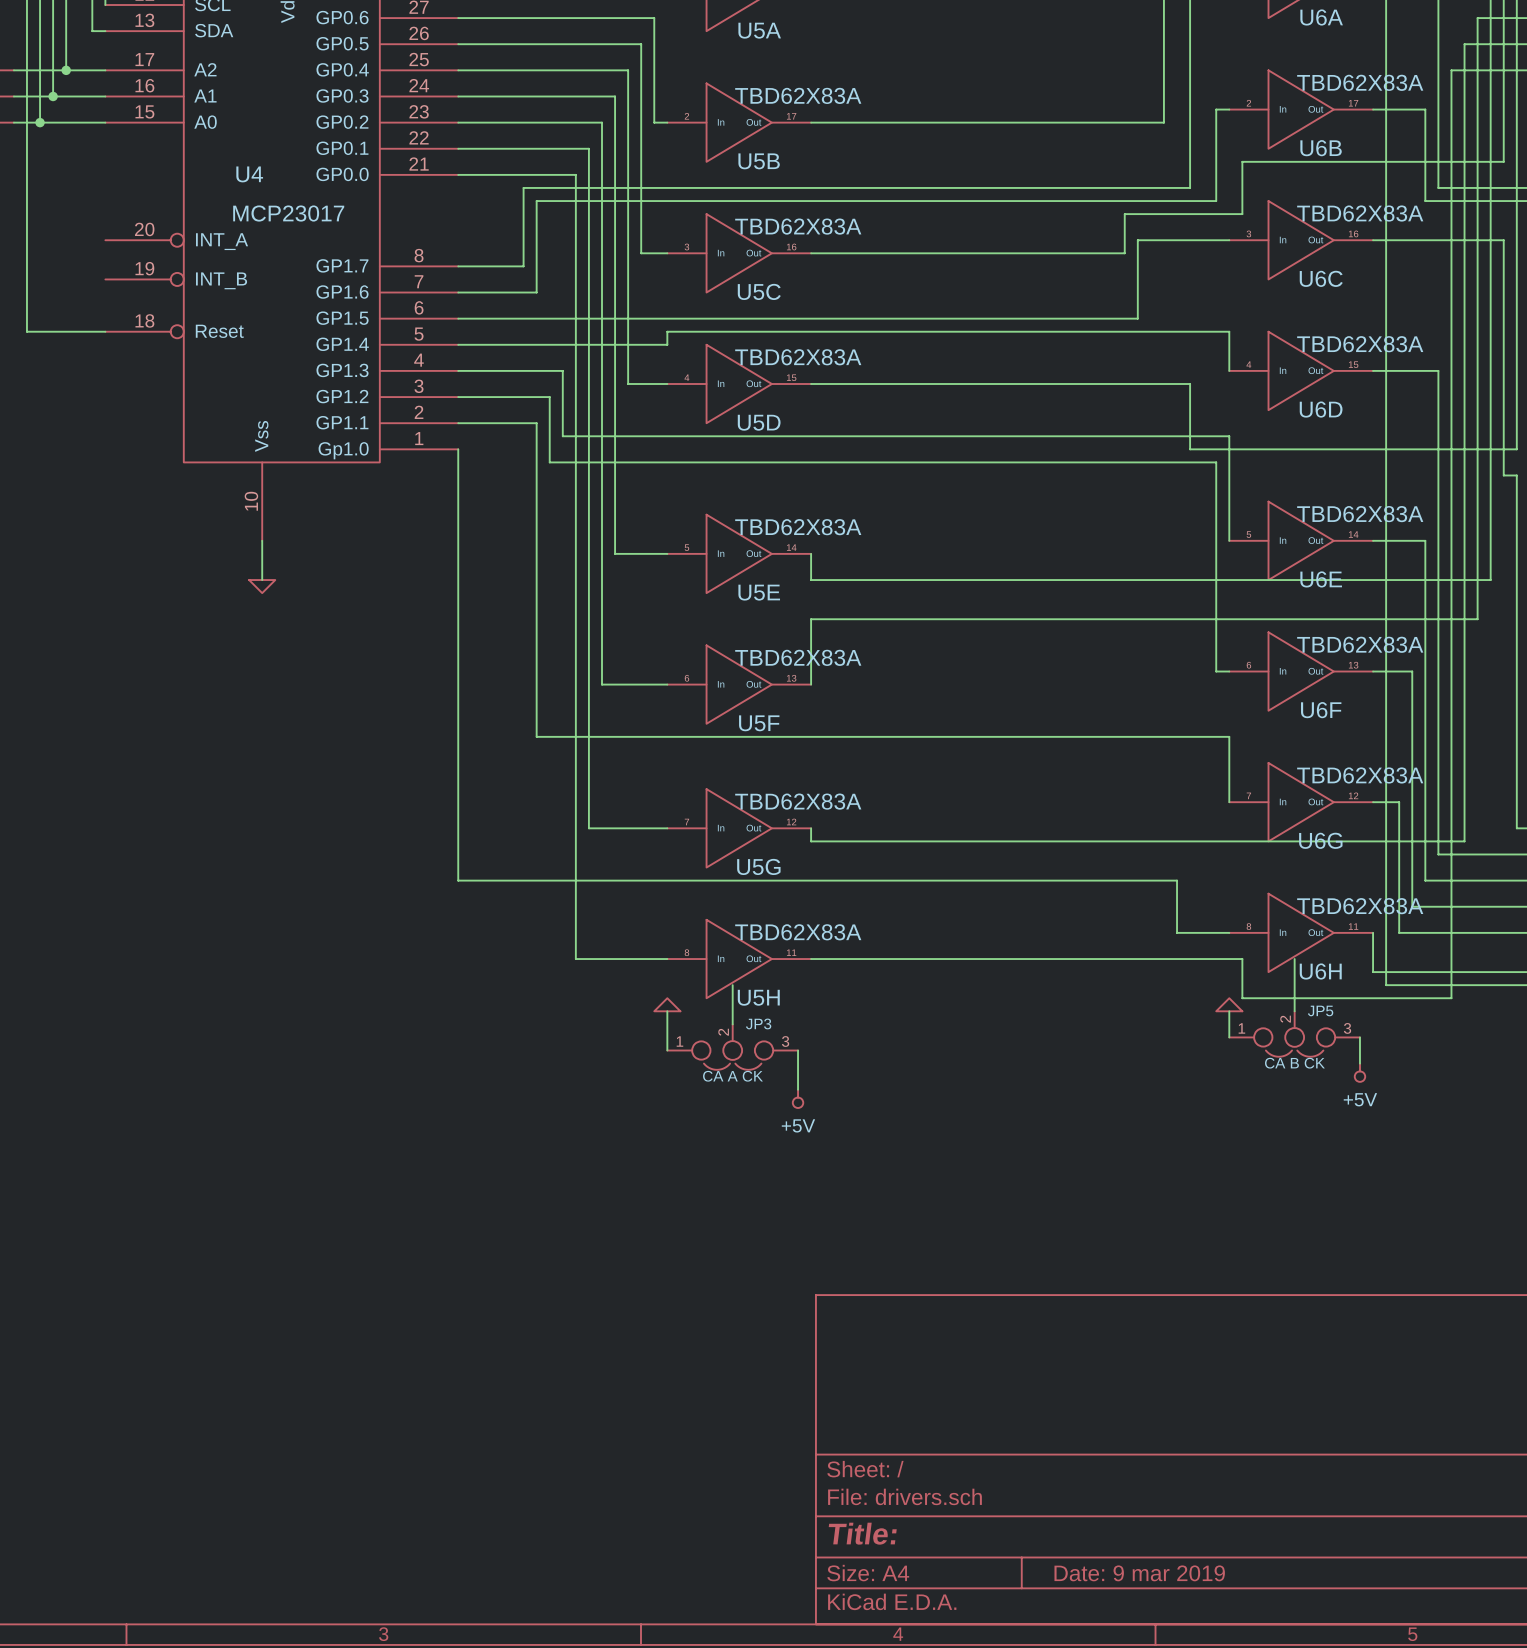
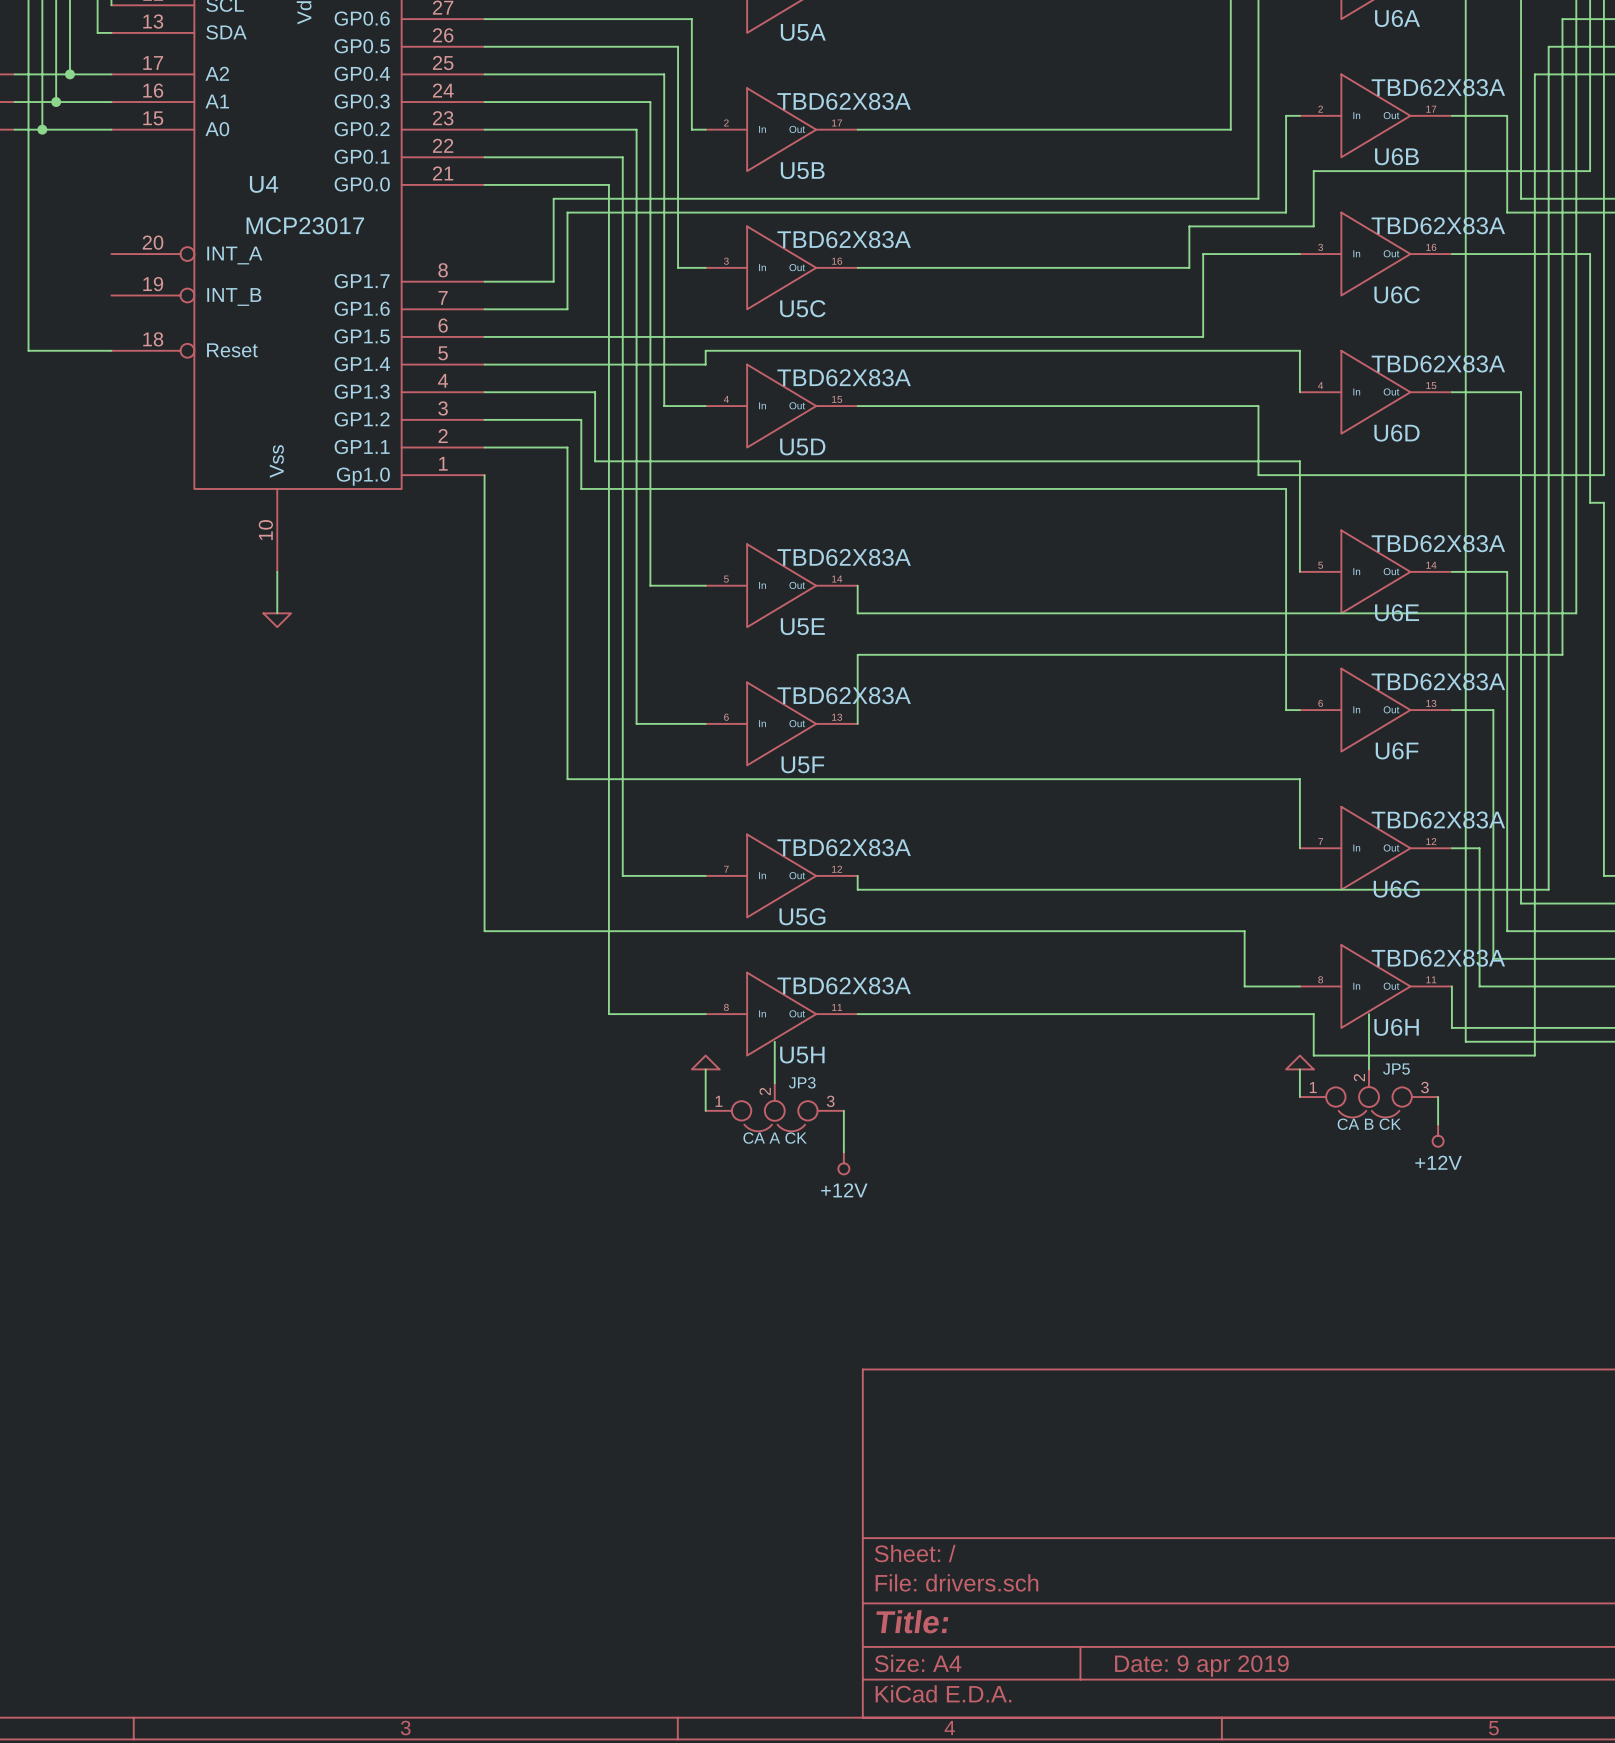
power symbol: +5V (1359, 1072) -> +12V (1438, 1135)
power symbol: +5V (798, 1098) -> +12V (843, 1163)
title block: Date: 9 mar 2019 (1139, 1573) -> Date: 9 apr 2019 (1201, 1666)

